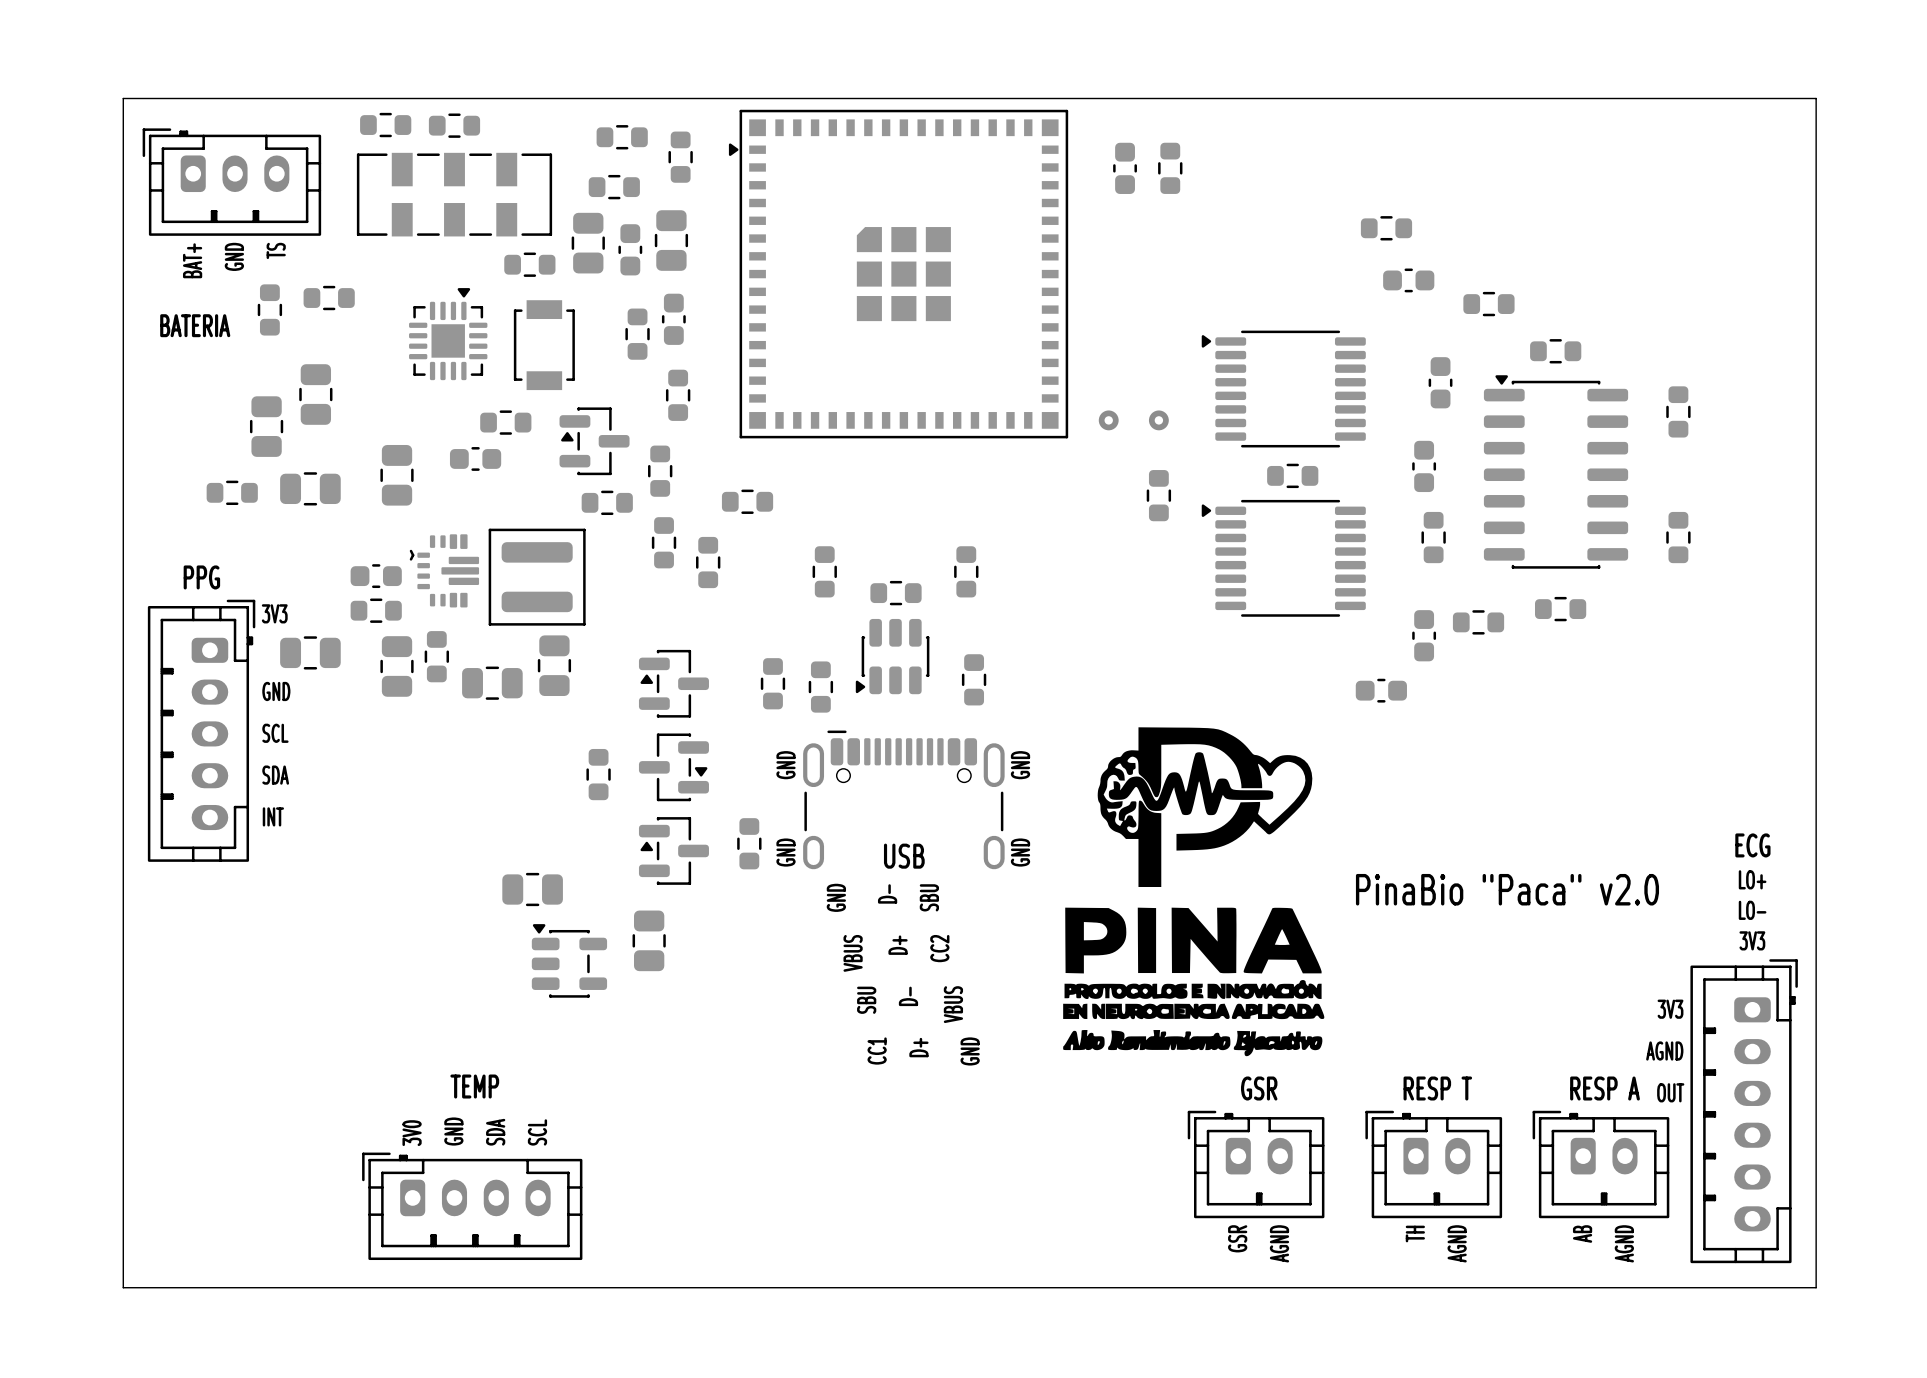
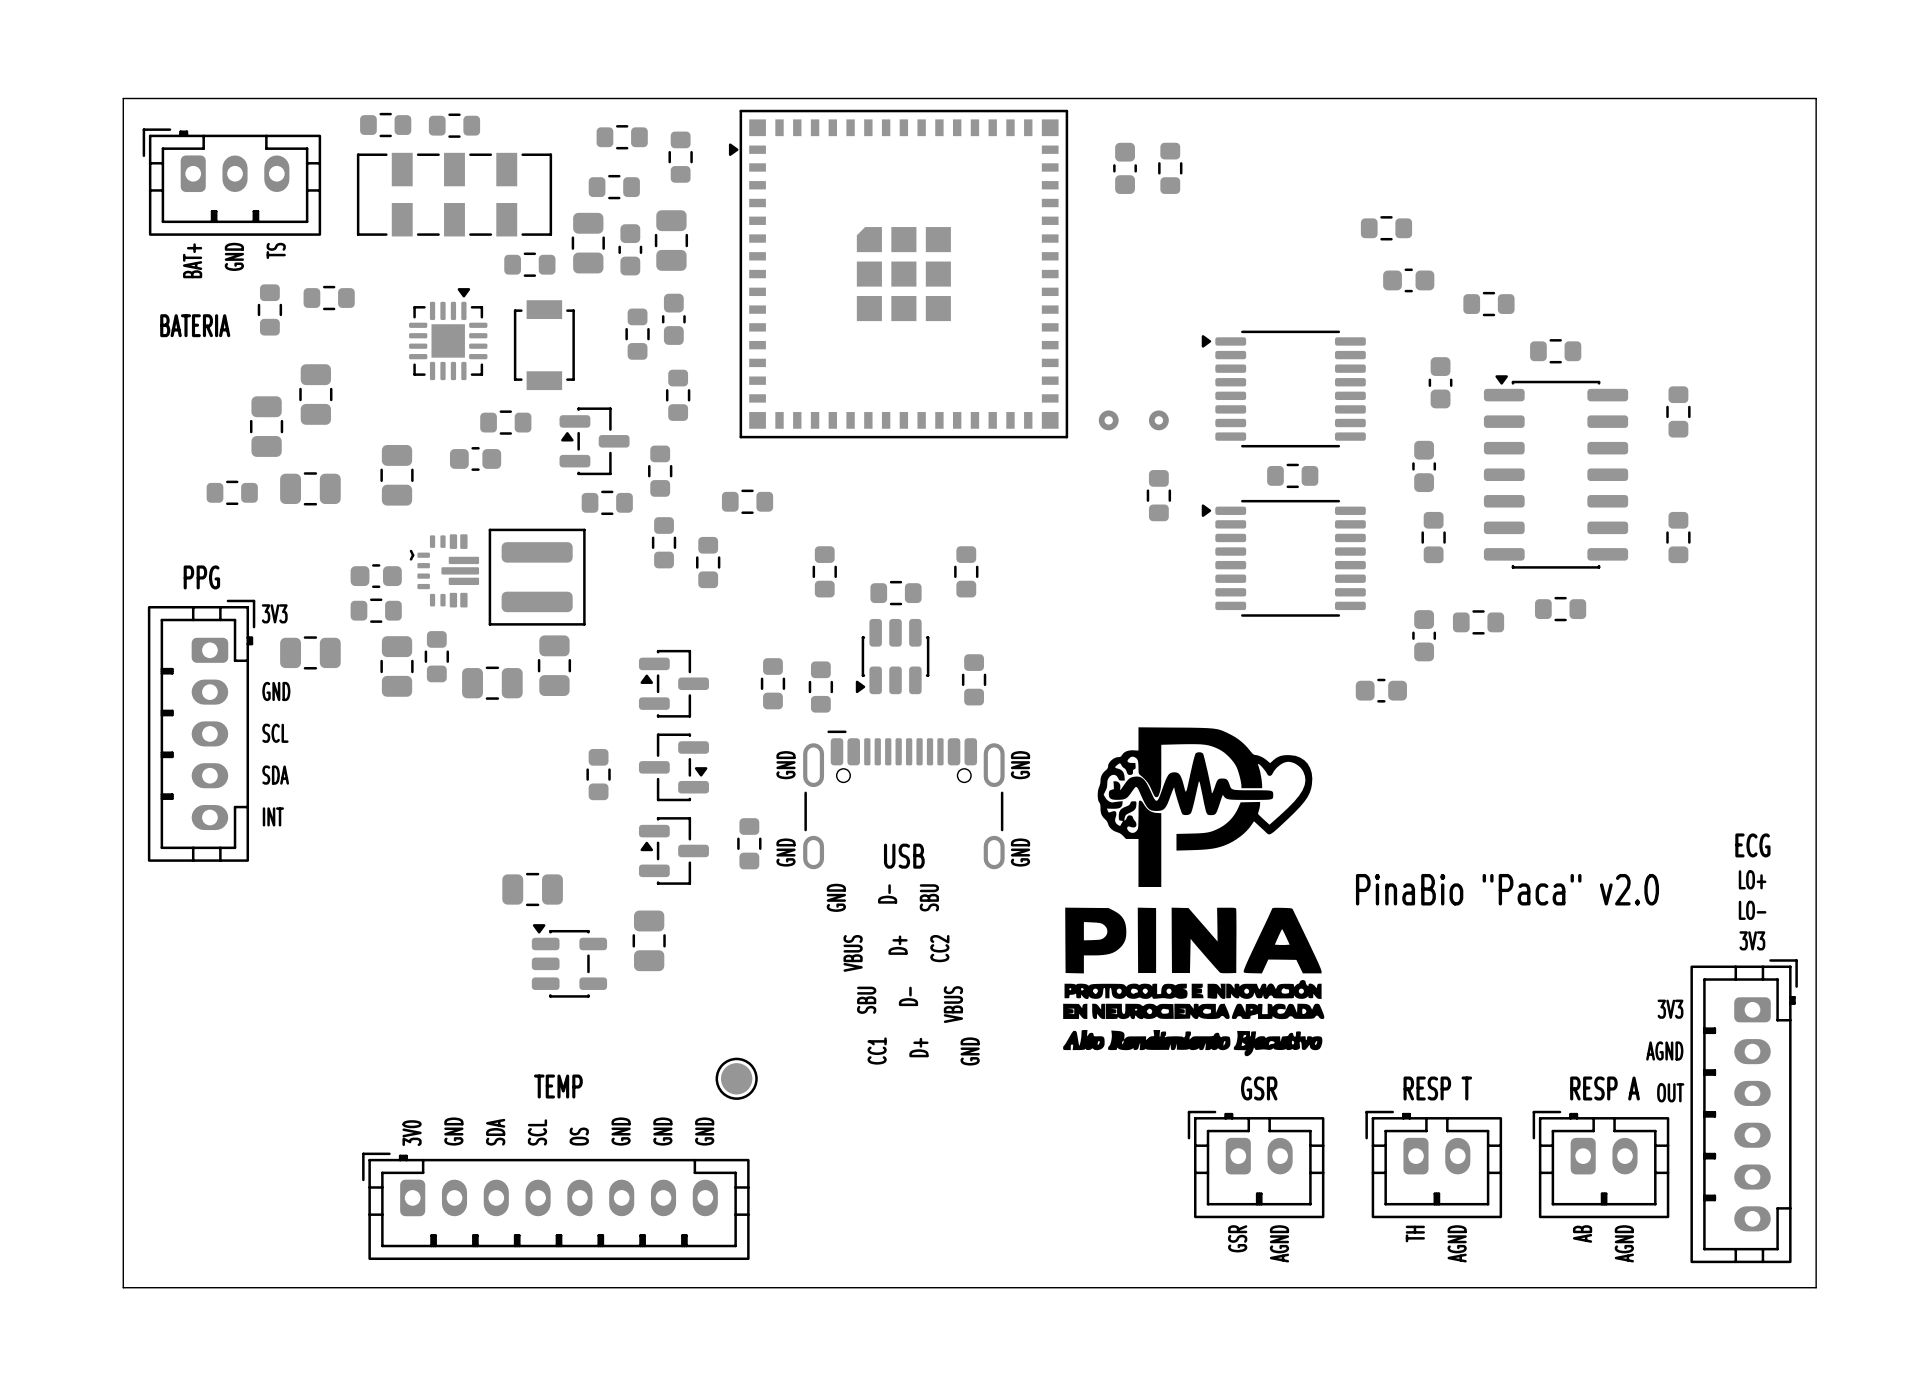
part: none -> (736, 1078)
text position: TEMP (474, 1086) -> TEMP (558, 1086)
text: none -> GND (621, 1131)
text: none -> GND (662, 1131)
text: none -> GND (704, 1131)
text: none -> OS (579, 1136)
part: (472, 1206) -> none
part: none -> (555, 1206)

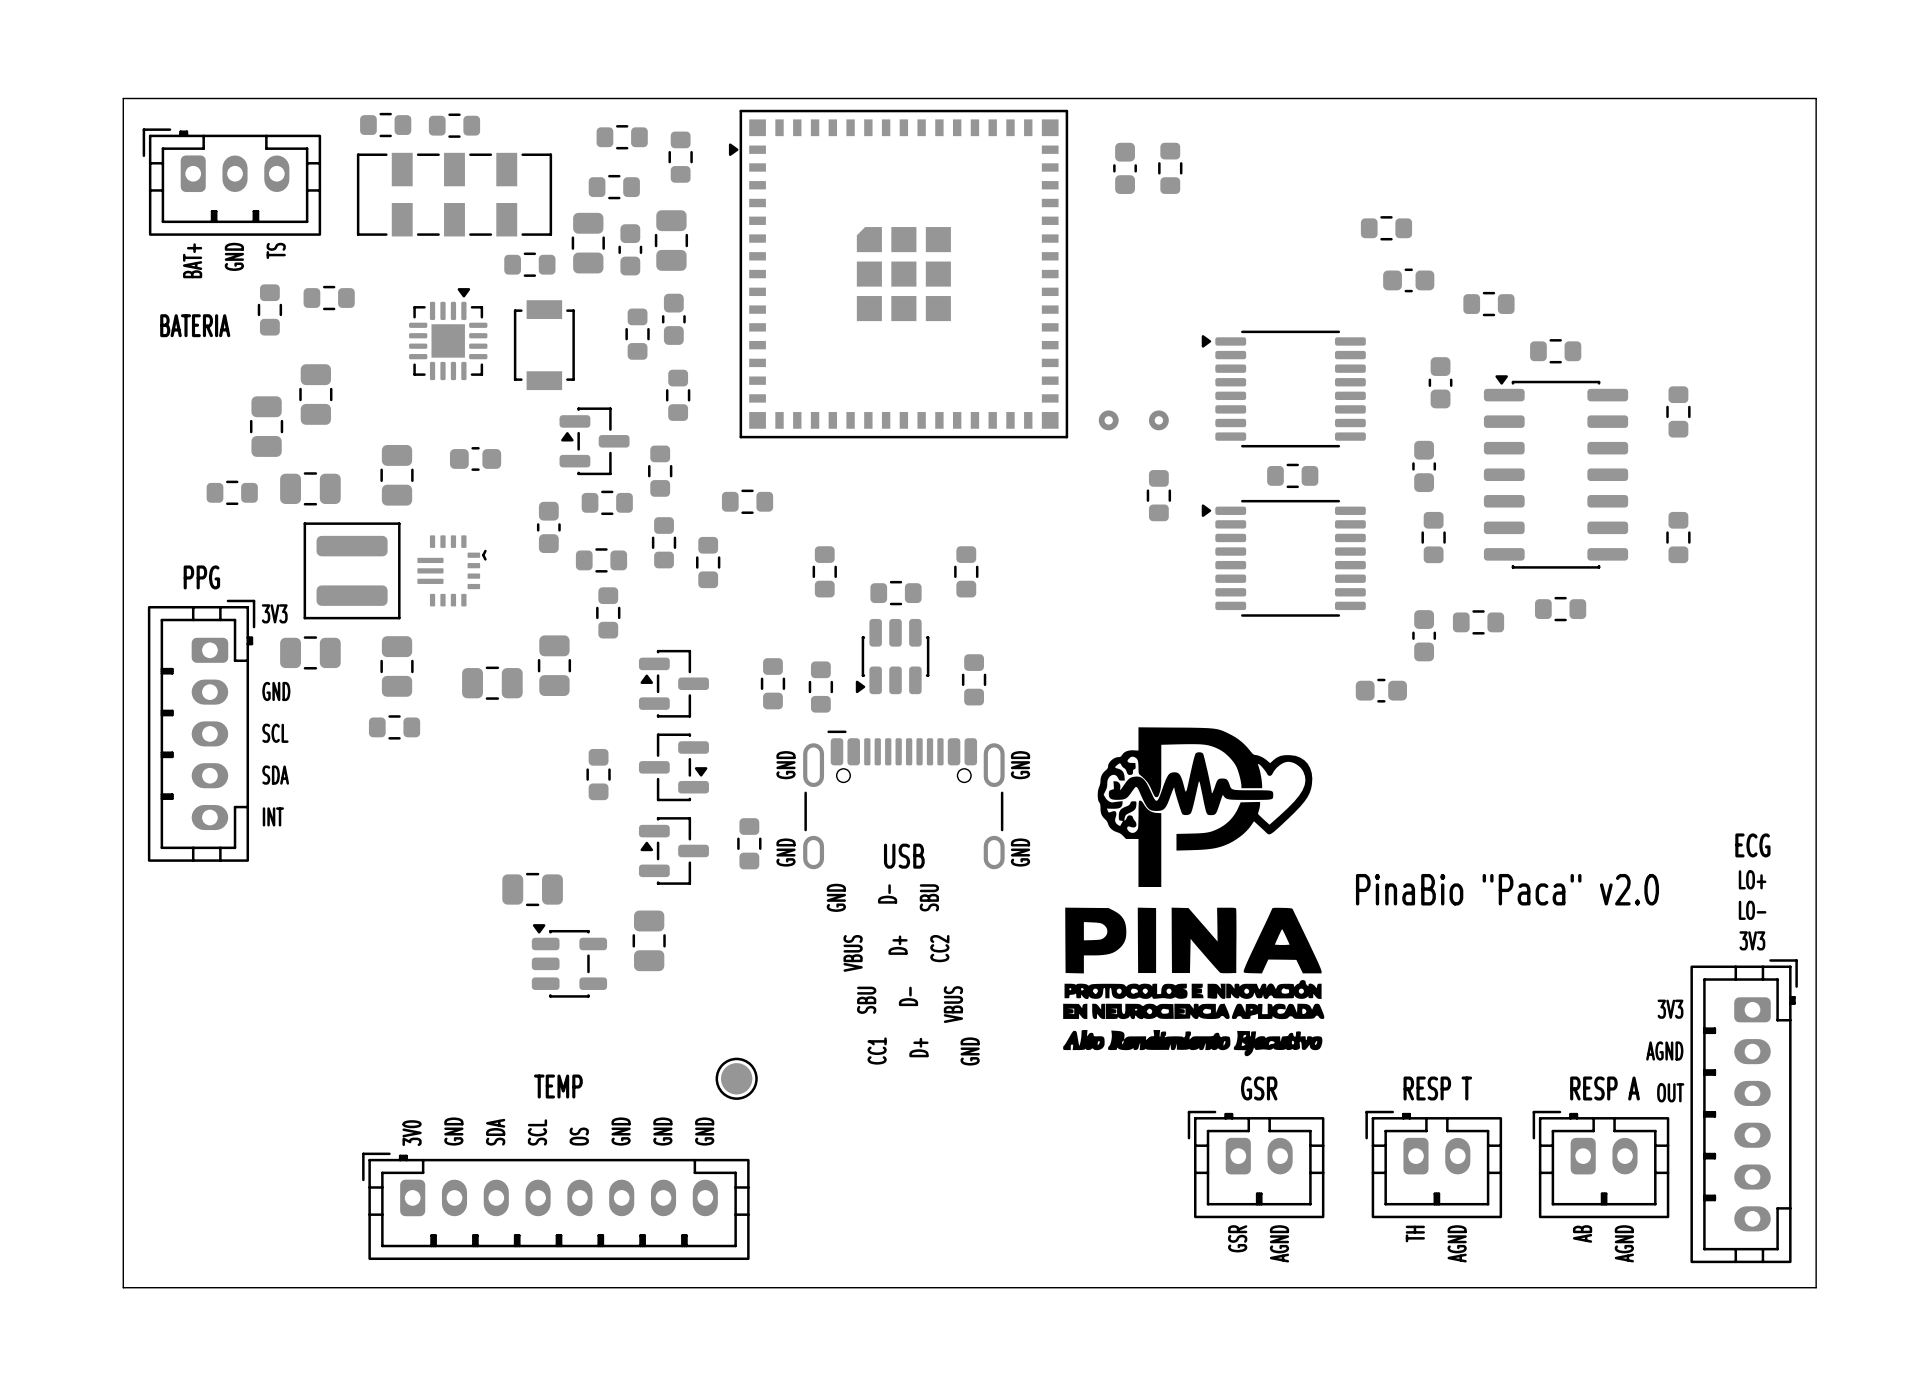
part: (505, 422) -> none
part footprint: [409, 534, 480, 608] -> [417, 535, 487, 607]
part: none -> (601, 560)
part rotation: 0° (376, 576) -> 90° clockwise (548, 527)
part position: (376, 576) -> (548, 527)
part position: (537, 577) -> (352, 570)
part: (376, 610) -> none
part: none -> (608, 612)
part: (436, 656) -> none
part: none -> (394, 727)

